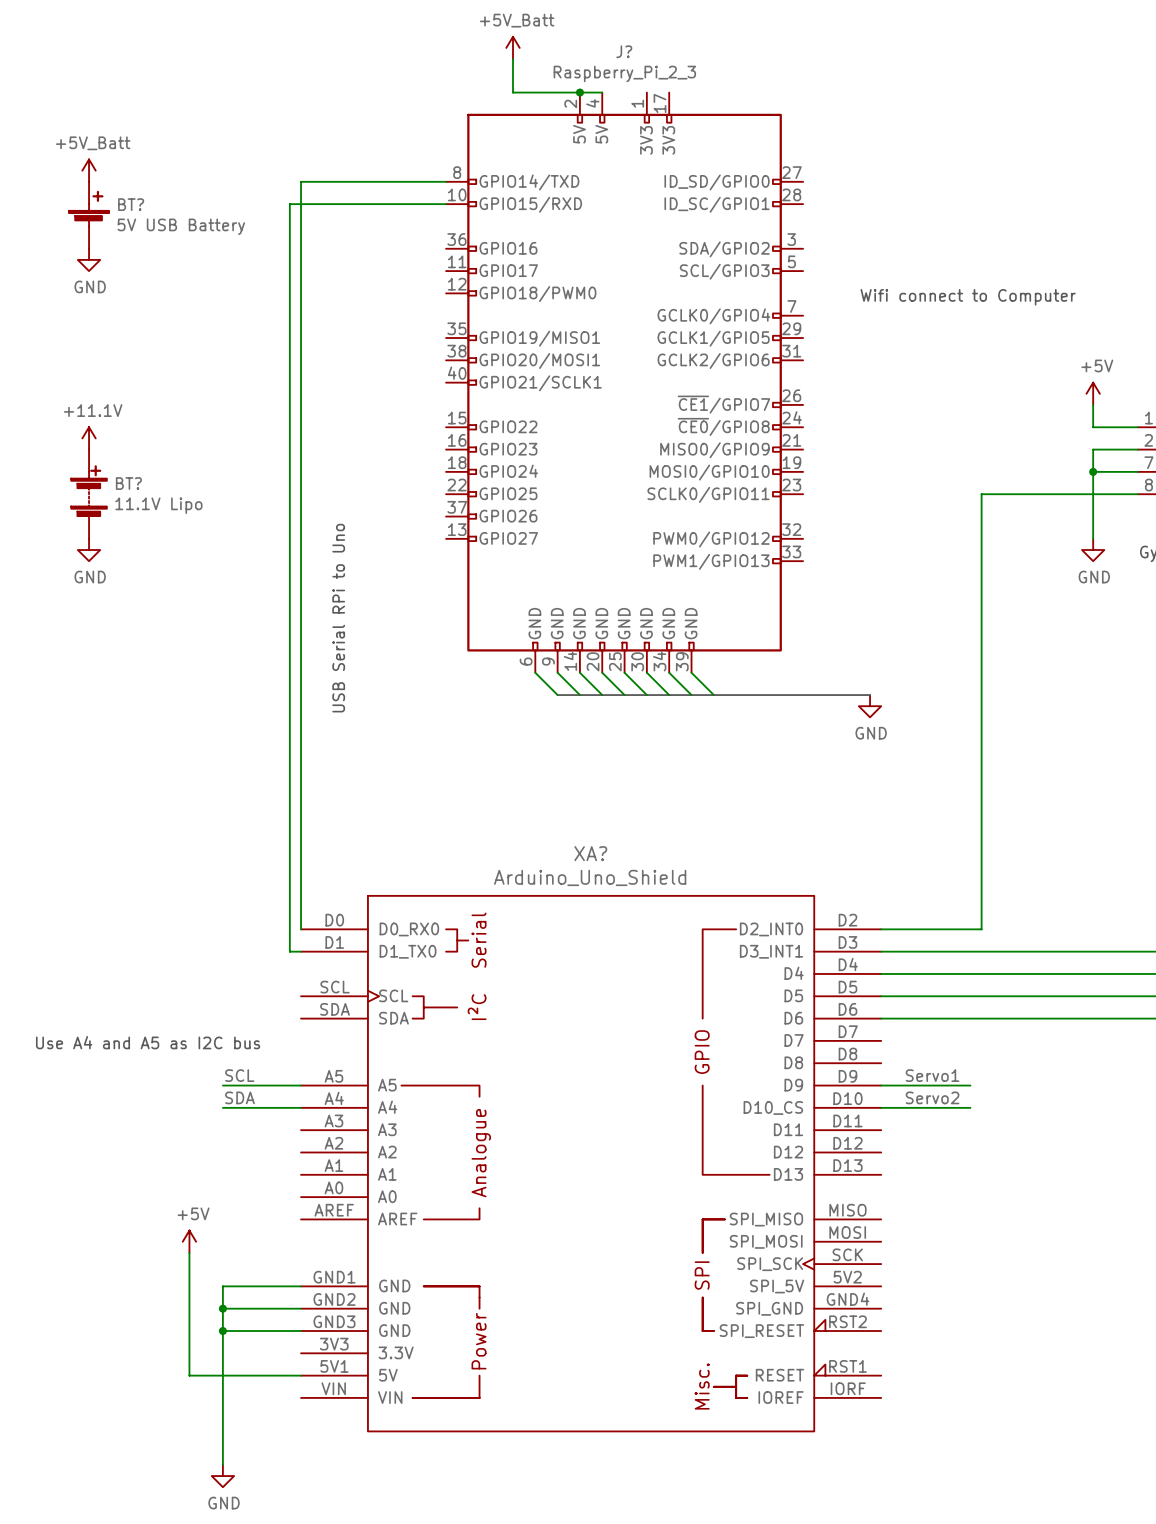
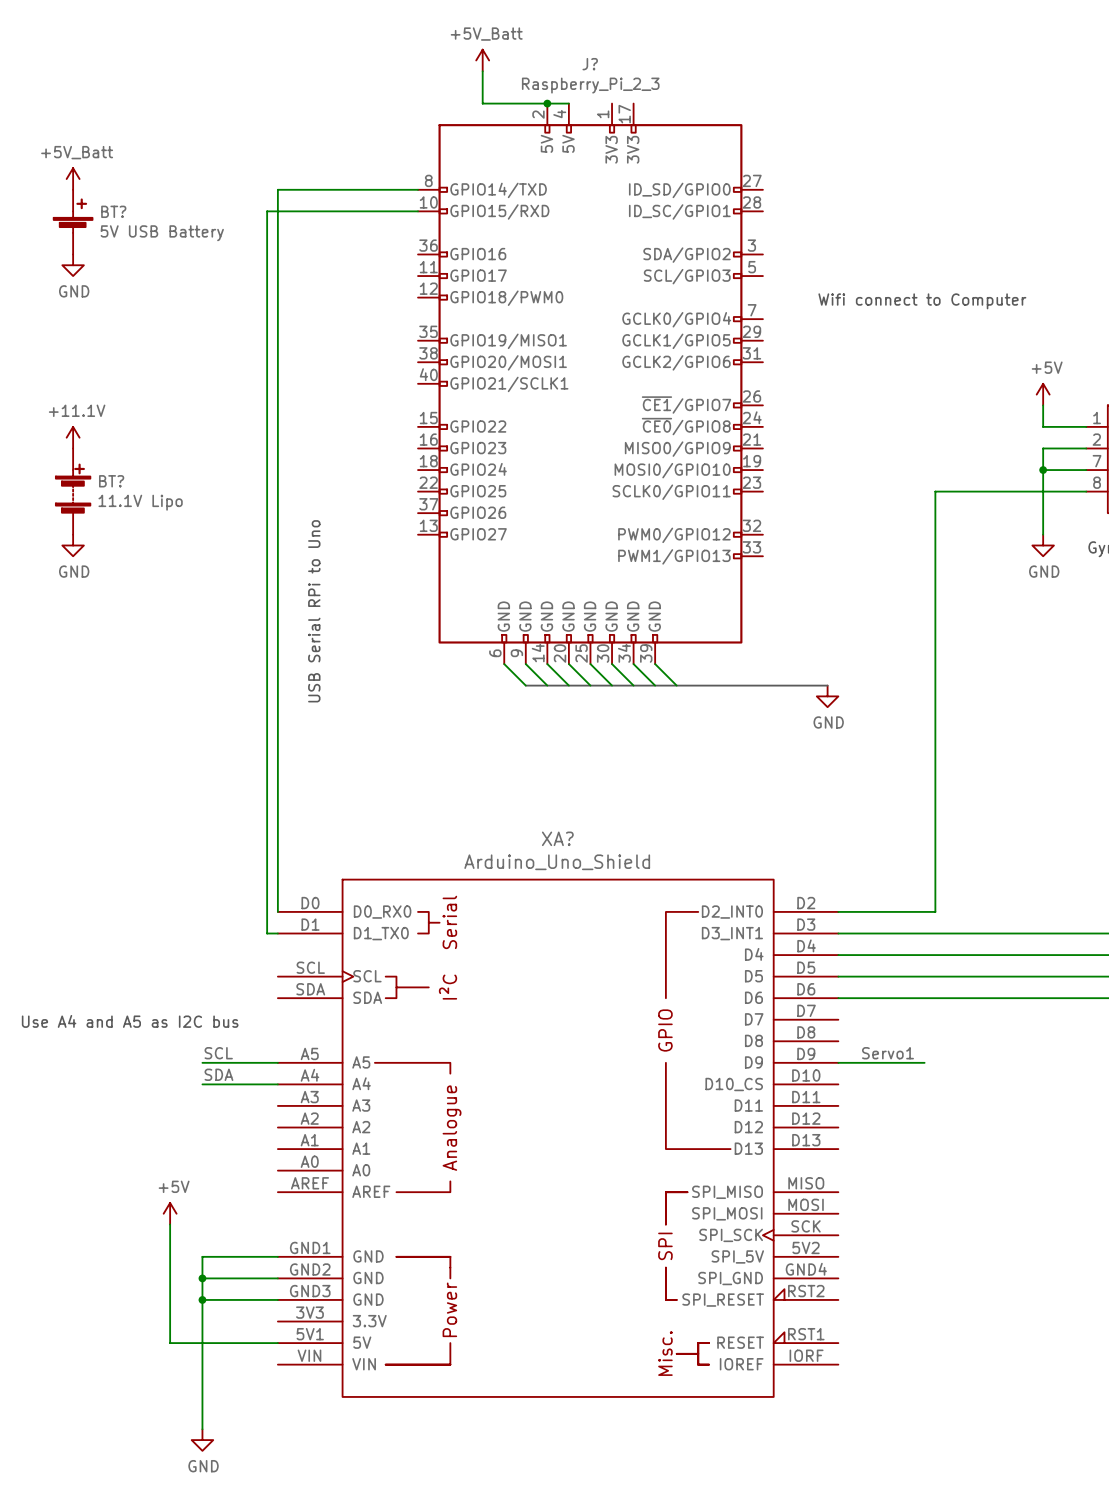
label: Servo2 (932, 1097) -> none
wire: (881, 1107) (970, 1107) -> none

